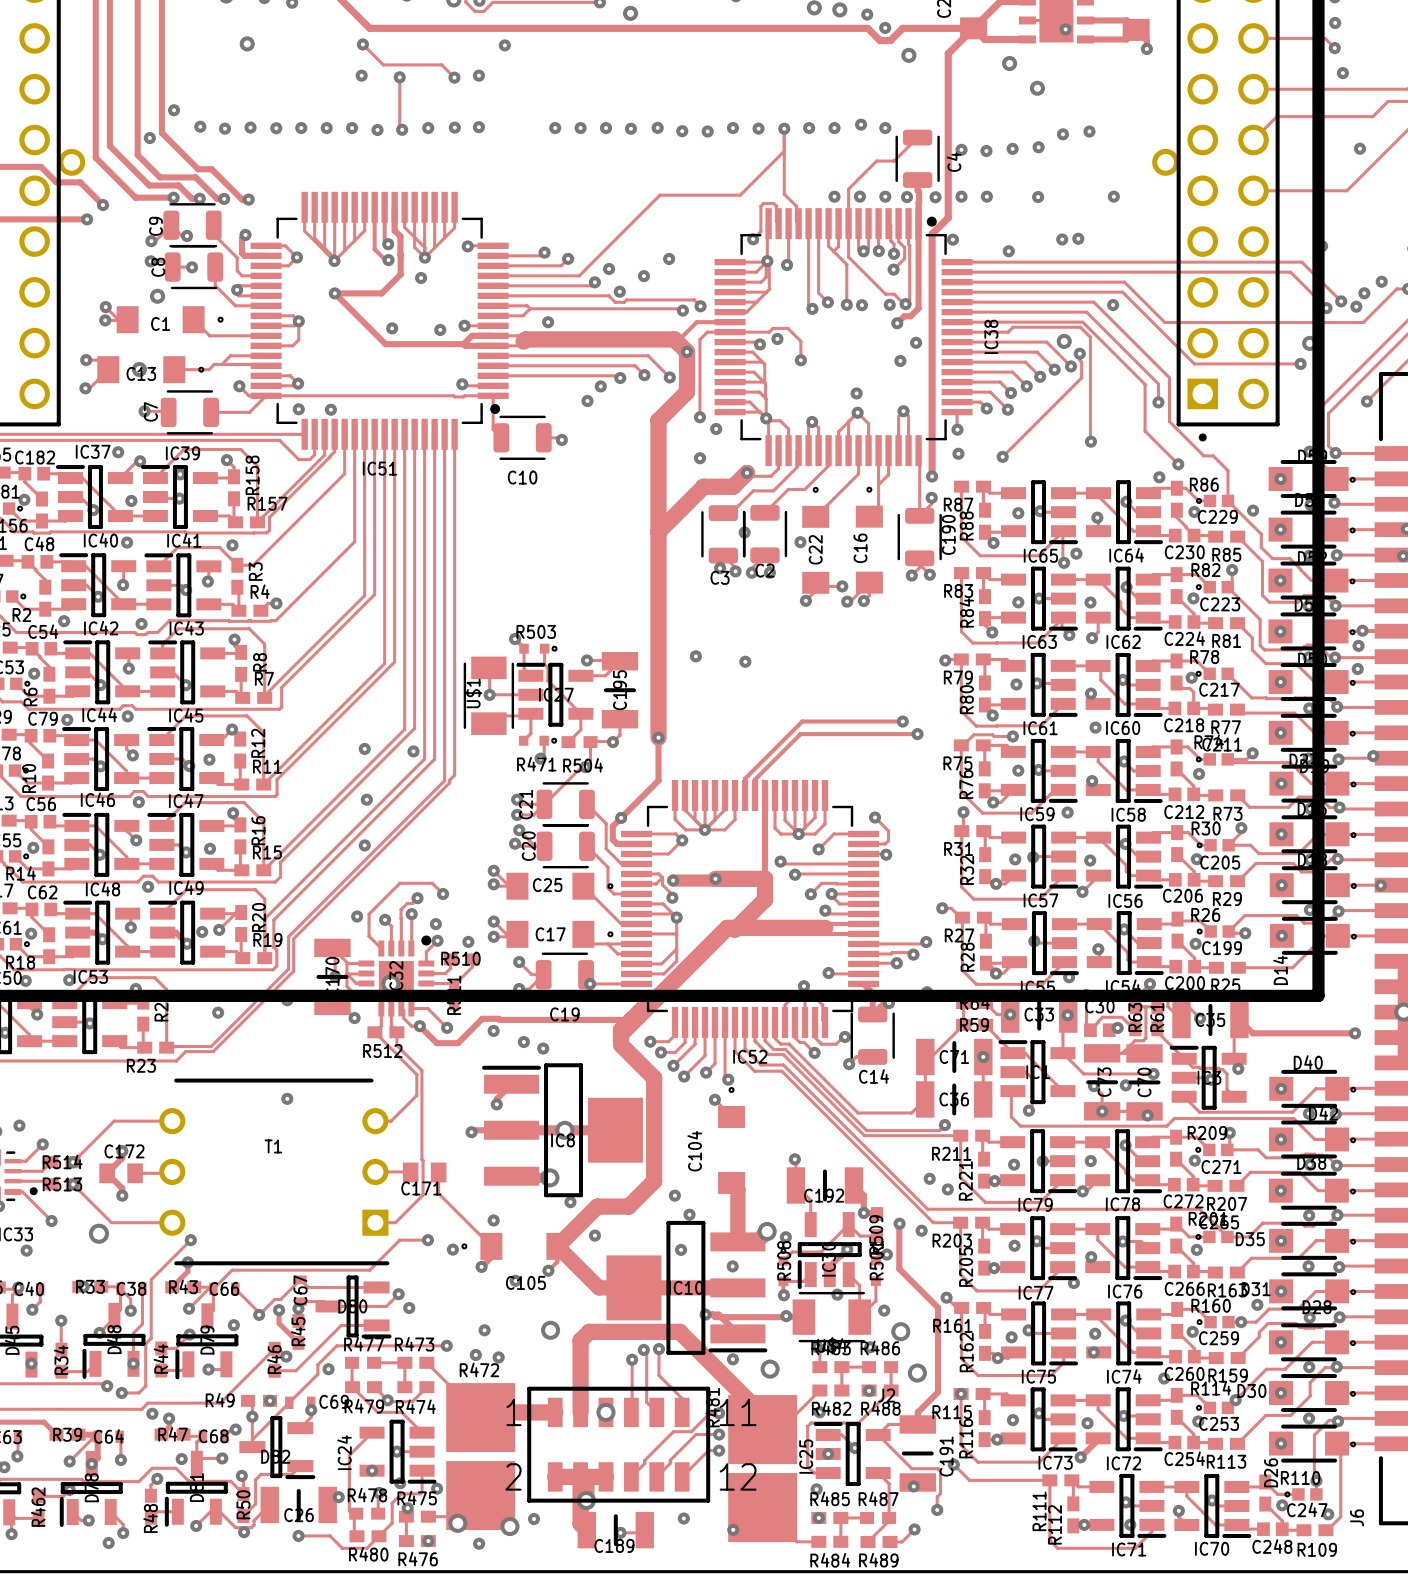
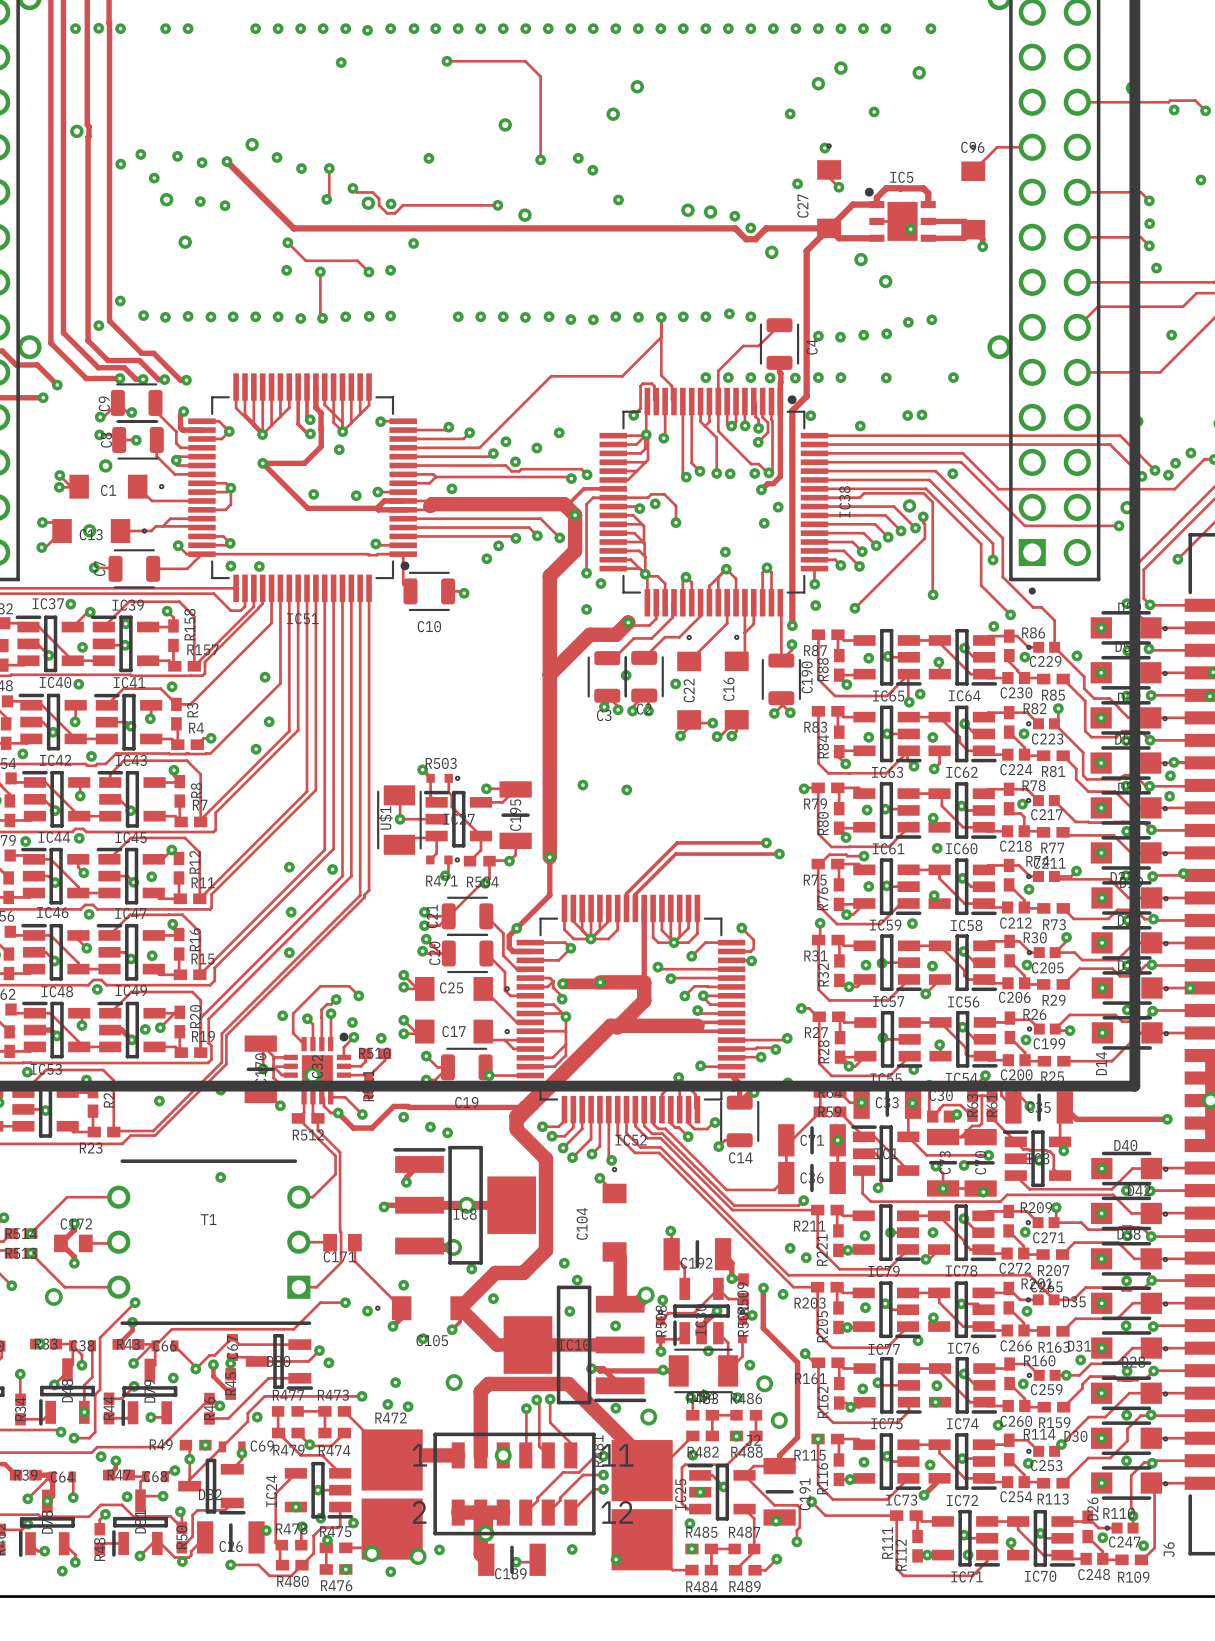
via: none -> (265, 677)
via: none -> (269, 721)
via: none -> (256, 749)

